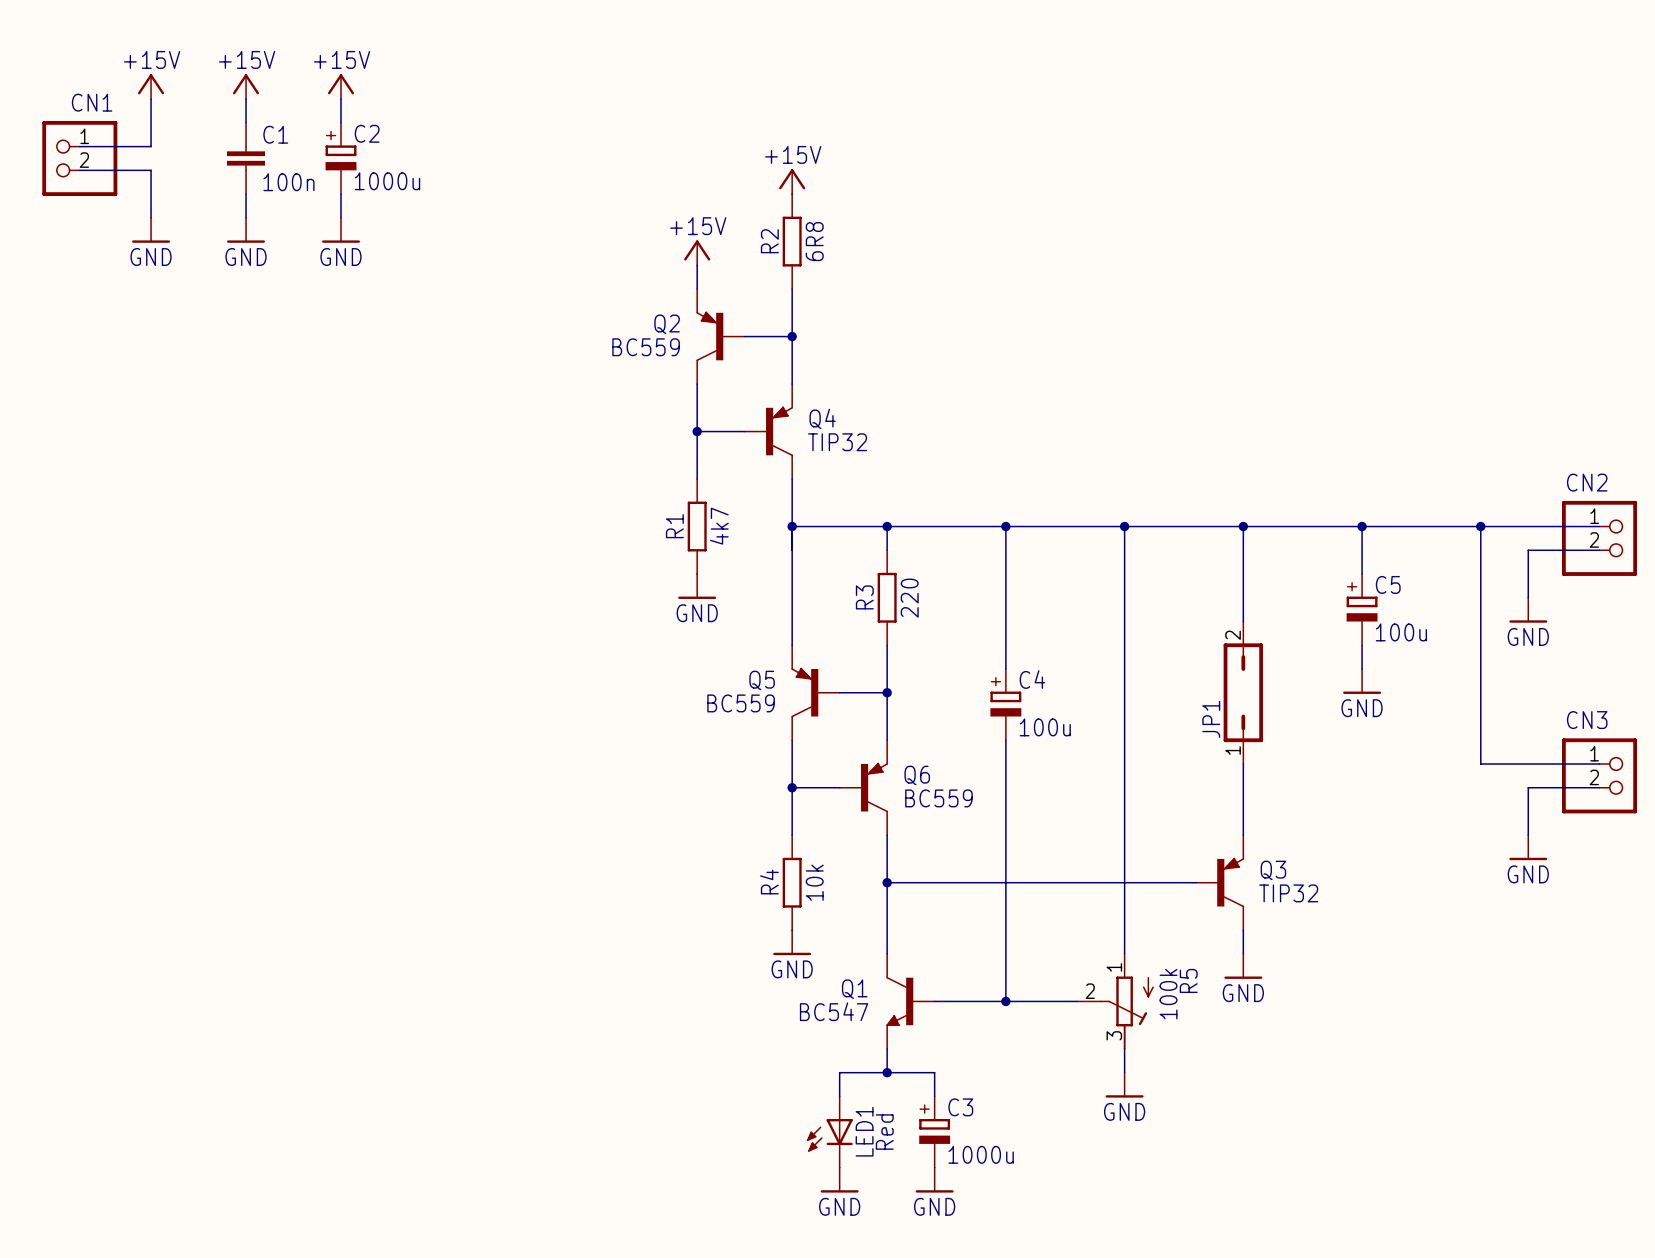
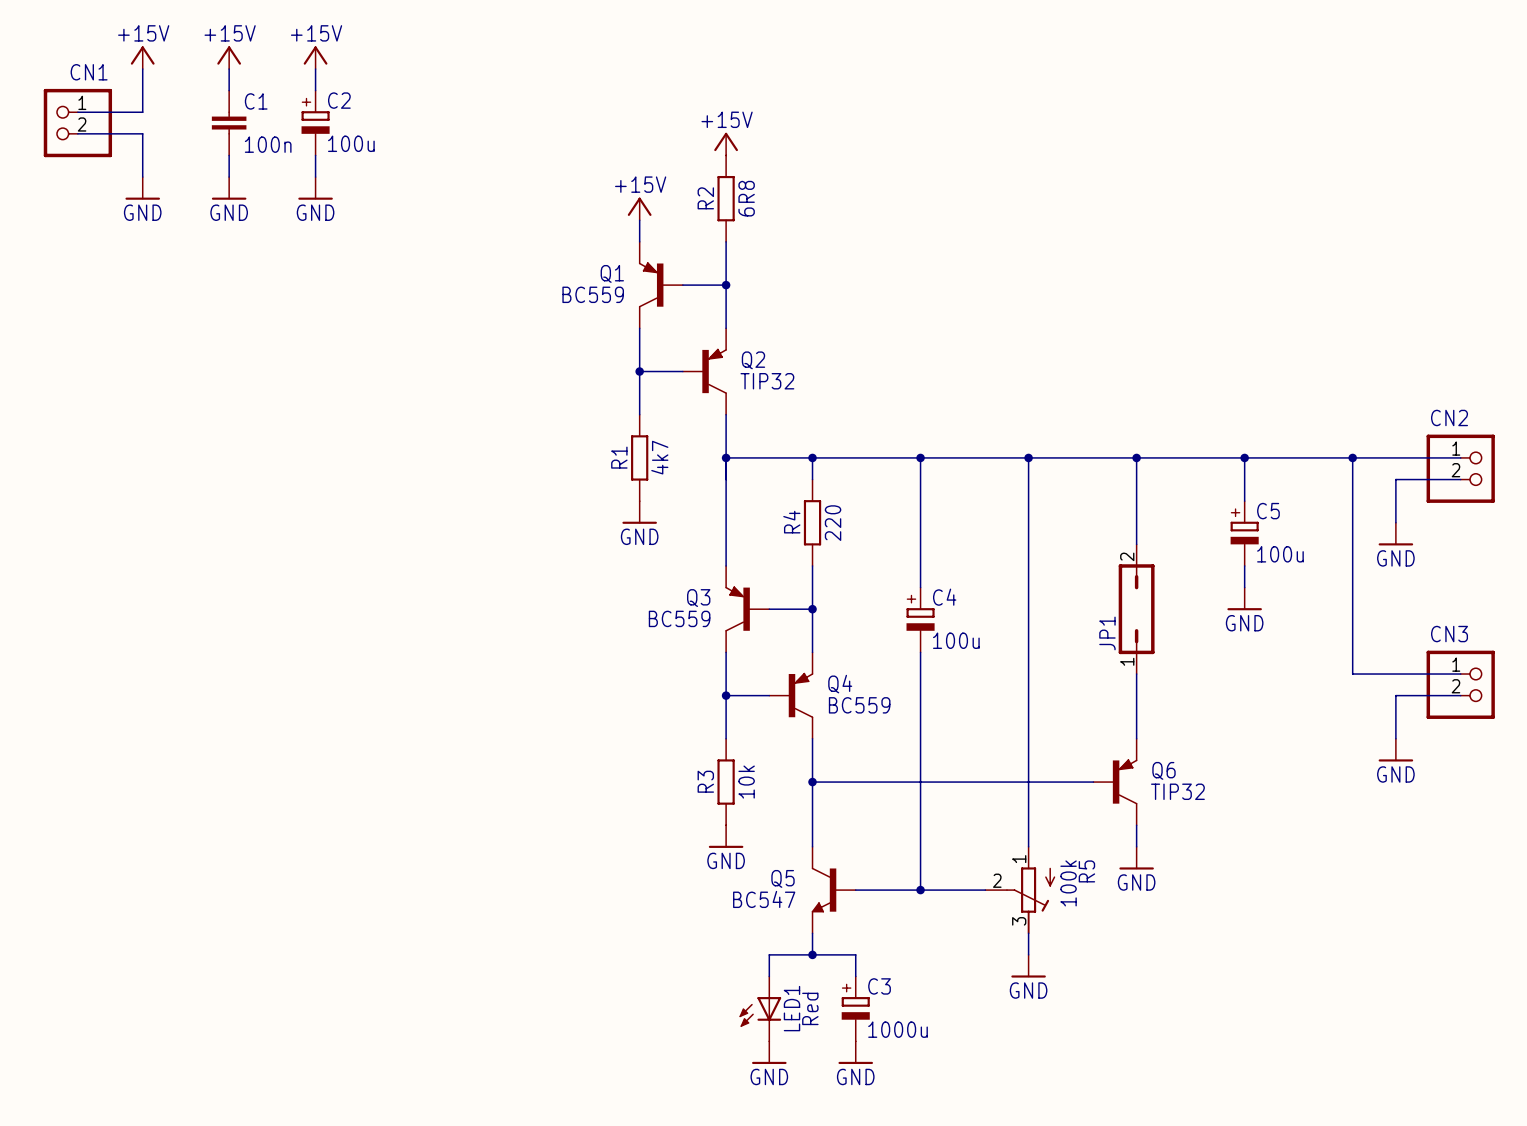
C2 value: 1000u (387, 181) -> 100u (351, 143)
Q2 name: Q2 (667, 324) -> Q1 (612, 273)
Q4 name: Q4 (822, 418) -> Q2 (753, 360)
R3 name: R3 (864, 597) -> R4 (791, 522)
Q5 name: Q5 (762, 680) -> Q3 (698, 598)
Q6 name: Q6 (917, 775) -> Q4 (840, 684)
Q3 name: Q3 (1273, 870) -> Q6 (1163, 770)
R4 name: R4 (769, 882) -> R3 (705, 781)
Q1 name: Q1 (854, 989) -> Q5 (782, 878)

